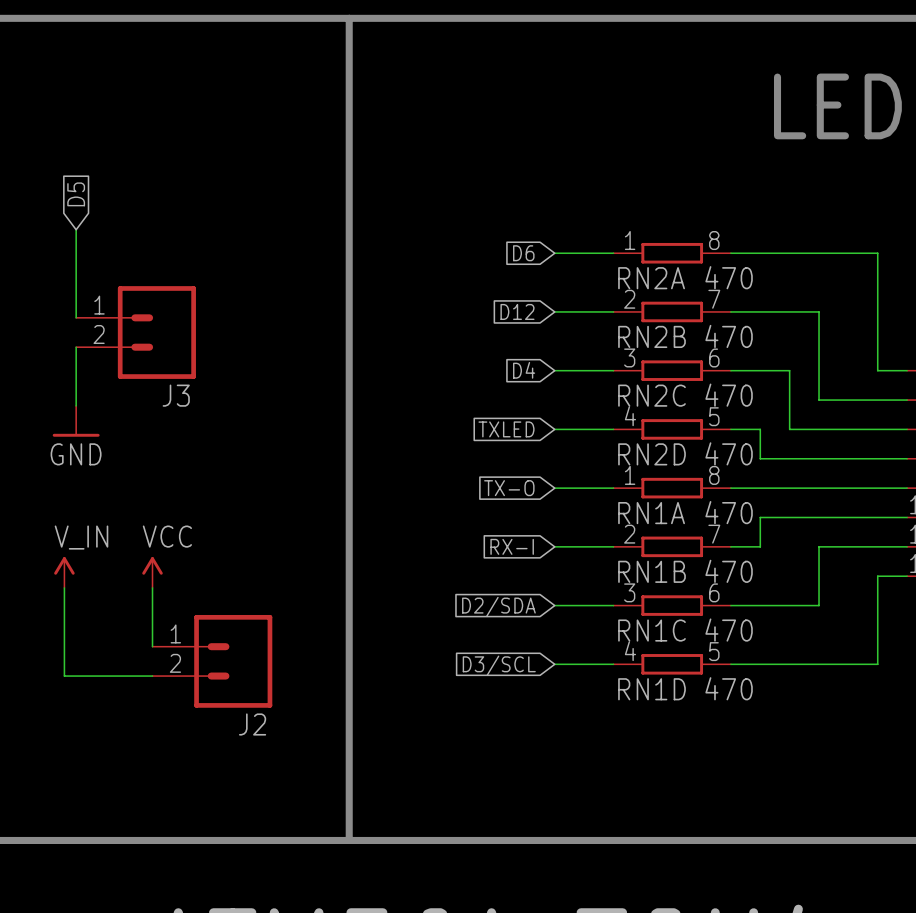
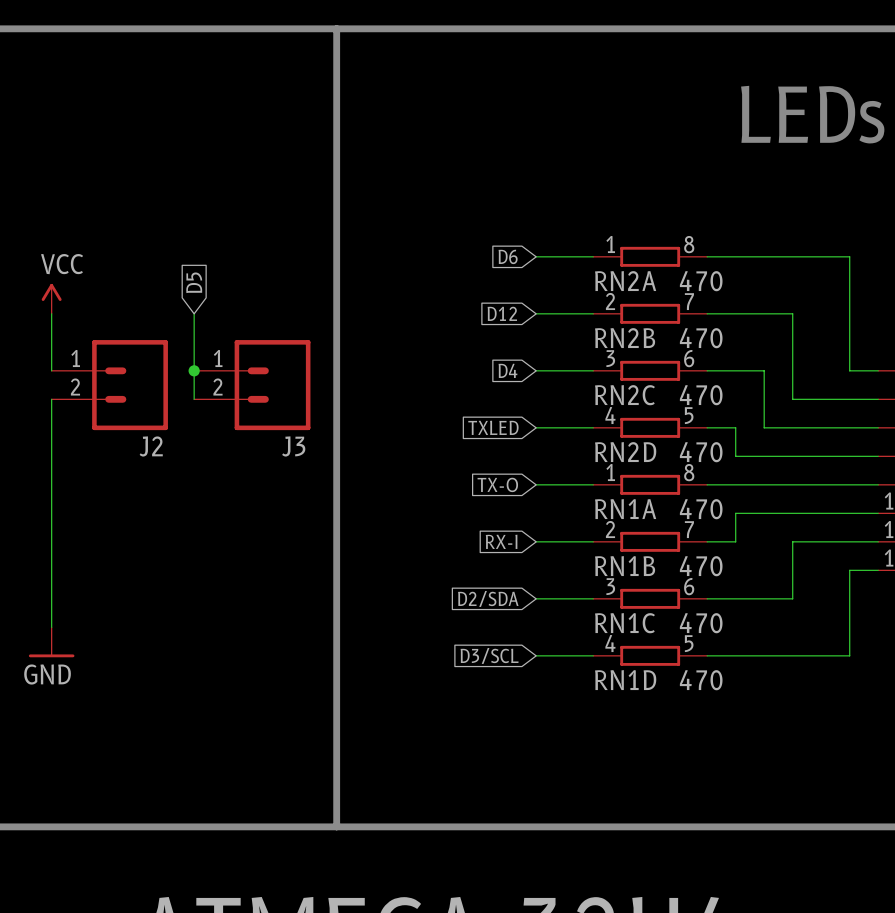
global label position: D5 (76, 194) -> D5 (194, 282)
wire: (76, 229) (76, 317) -> (194, 313) (194, 399)
power symbol: none -> VCC (51, 298)
J3 position: (136, 332) -> (252, 385)
wire: (76, 347) (76, 405) -> (51, 313) (51, 370)
junction: none -> (194, 370)
wire: none -> (51, 399) (51, 627)
power symbol position: GND (76, 421) -> GND (51, 642)
power symbol: V_IN (64, 572) -> none
power symbol: VCC (152, 572) -> none
wire: (64, 587) (64, 676) (152, 676) -> none
wire: (152, 587) (152, 646) -> none
J2 position: (212, 661) -> (109, 385)

